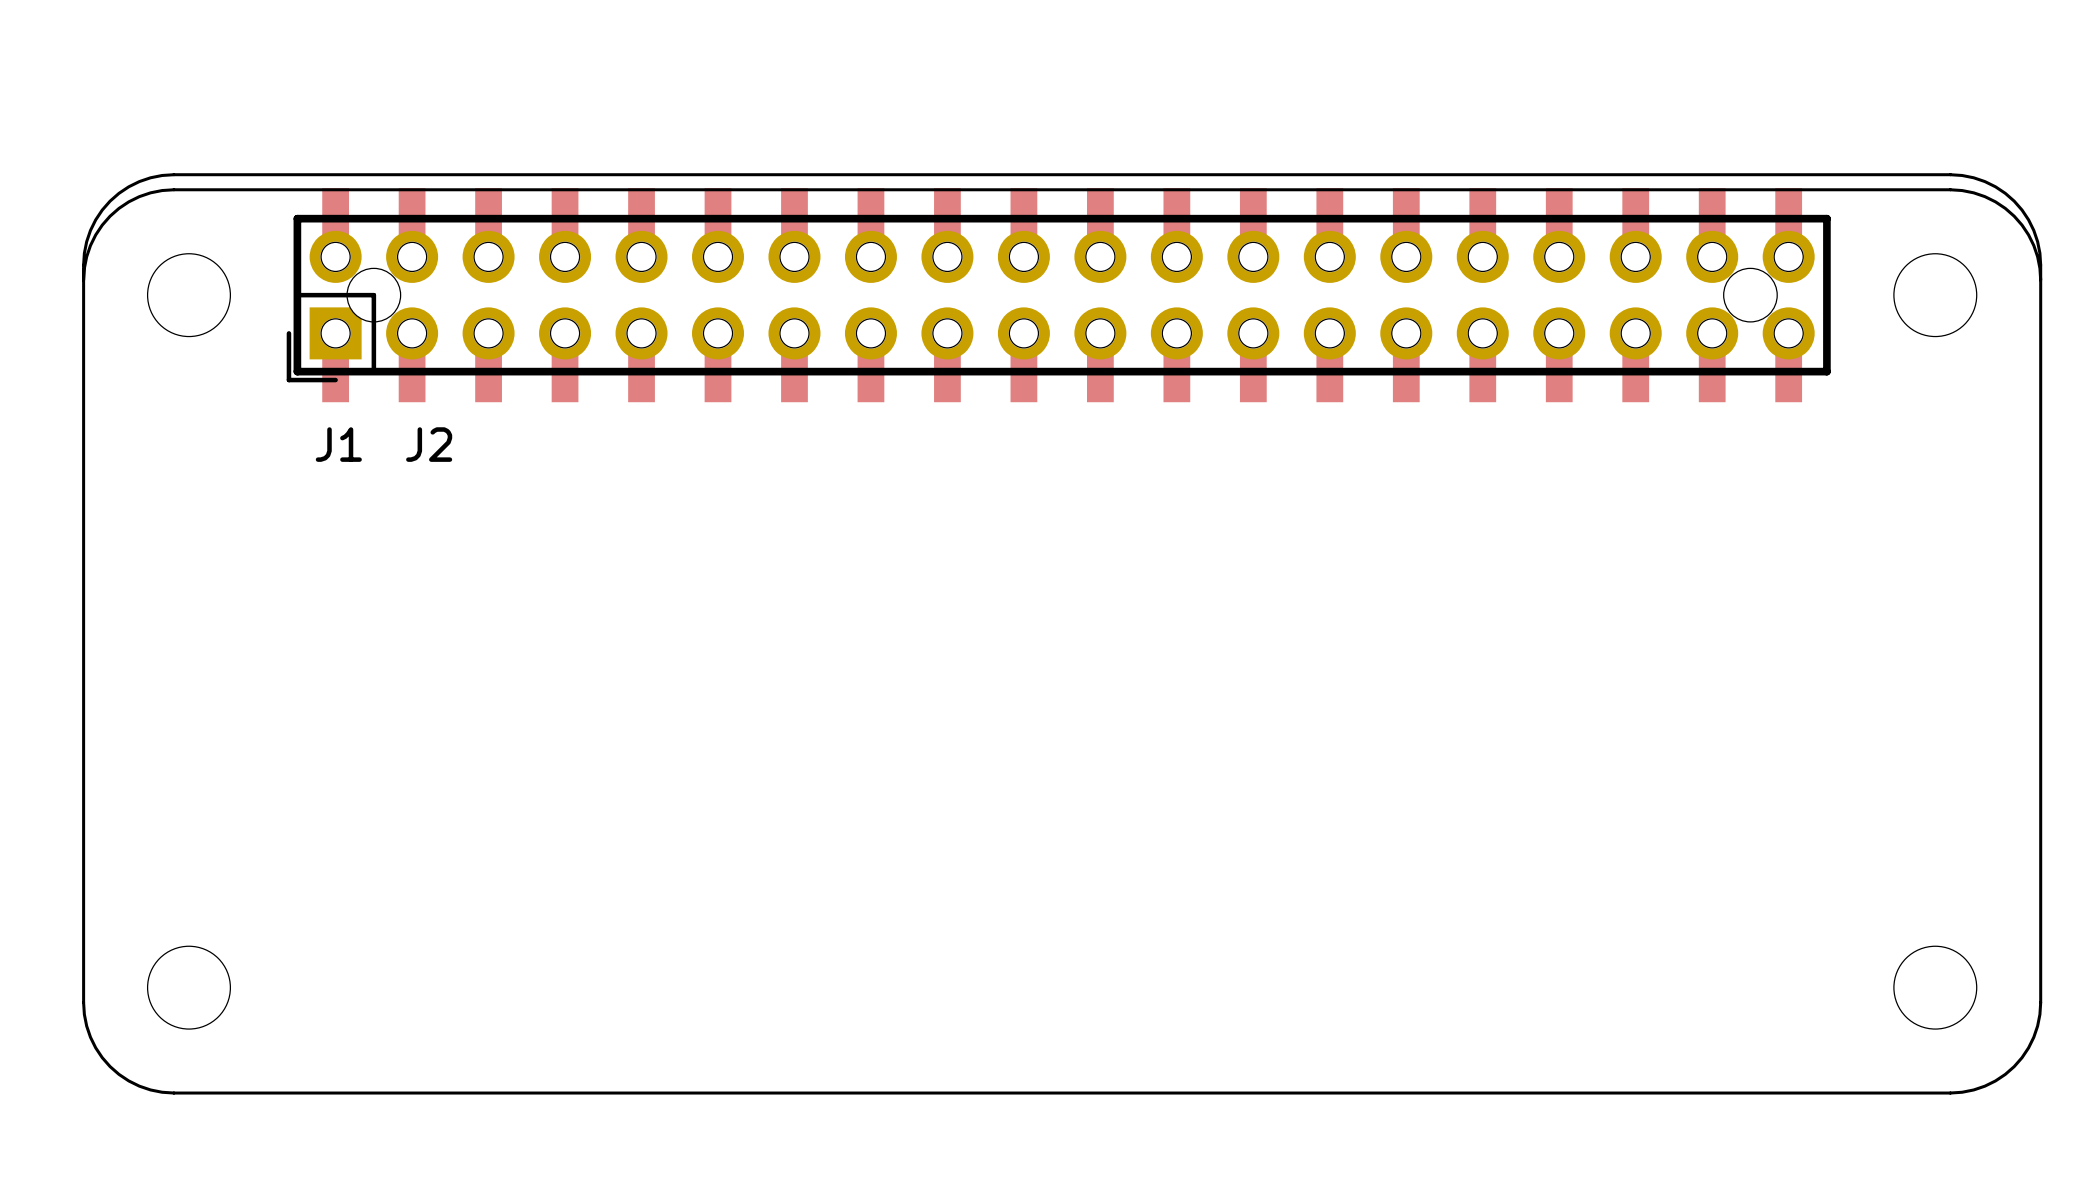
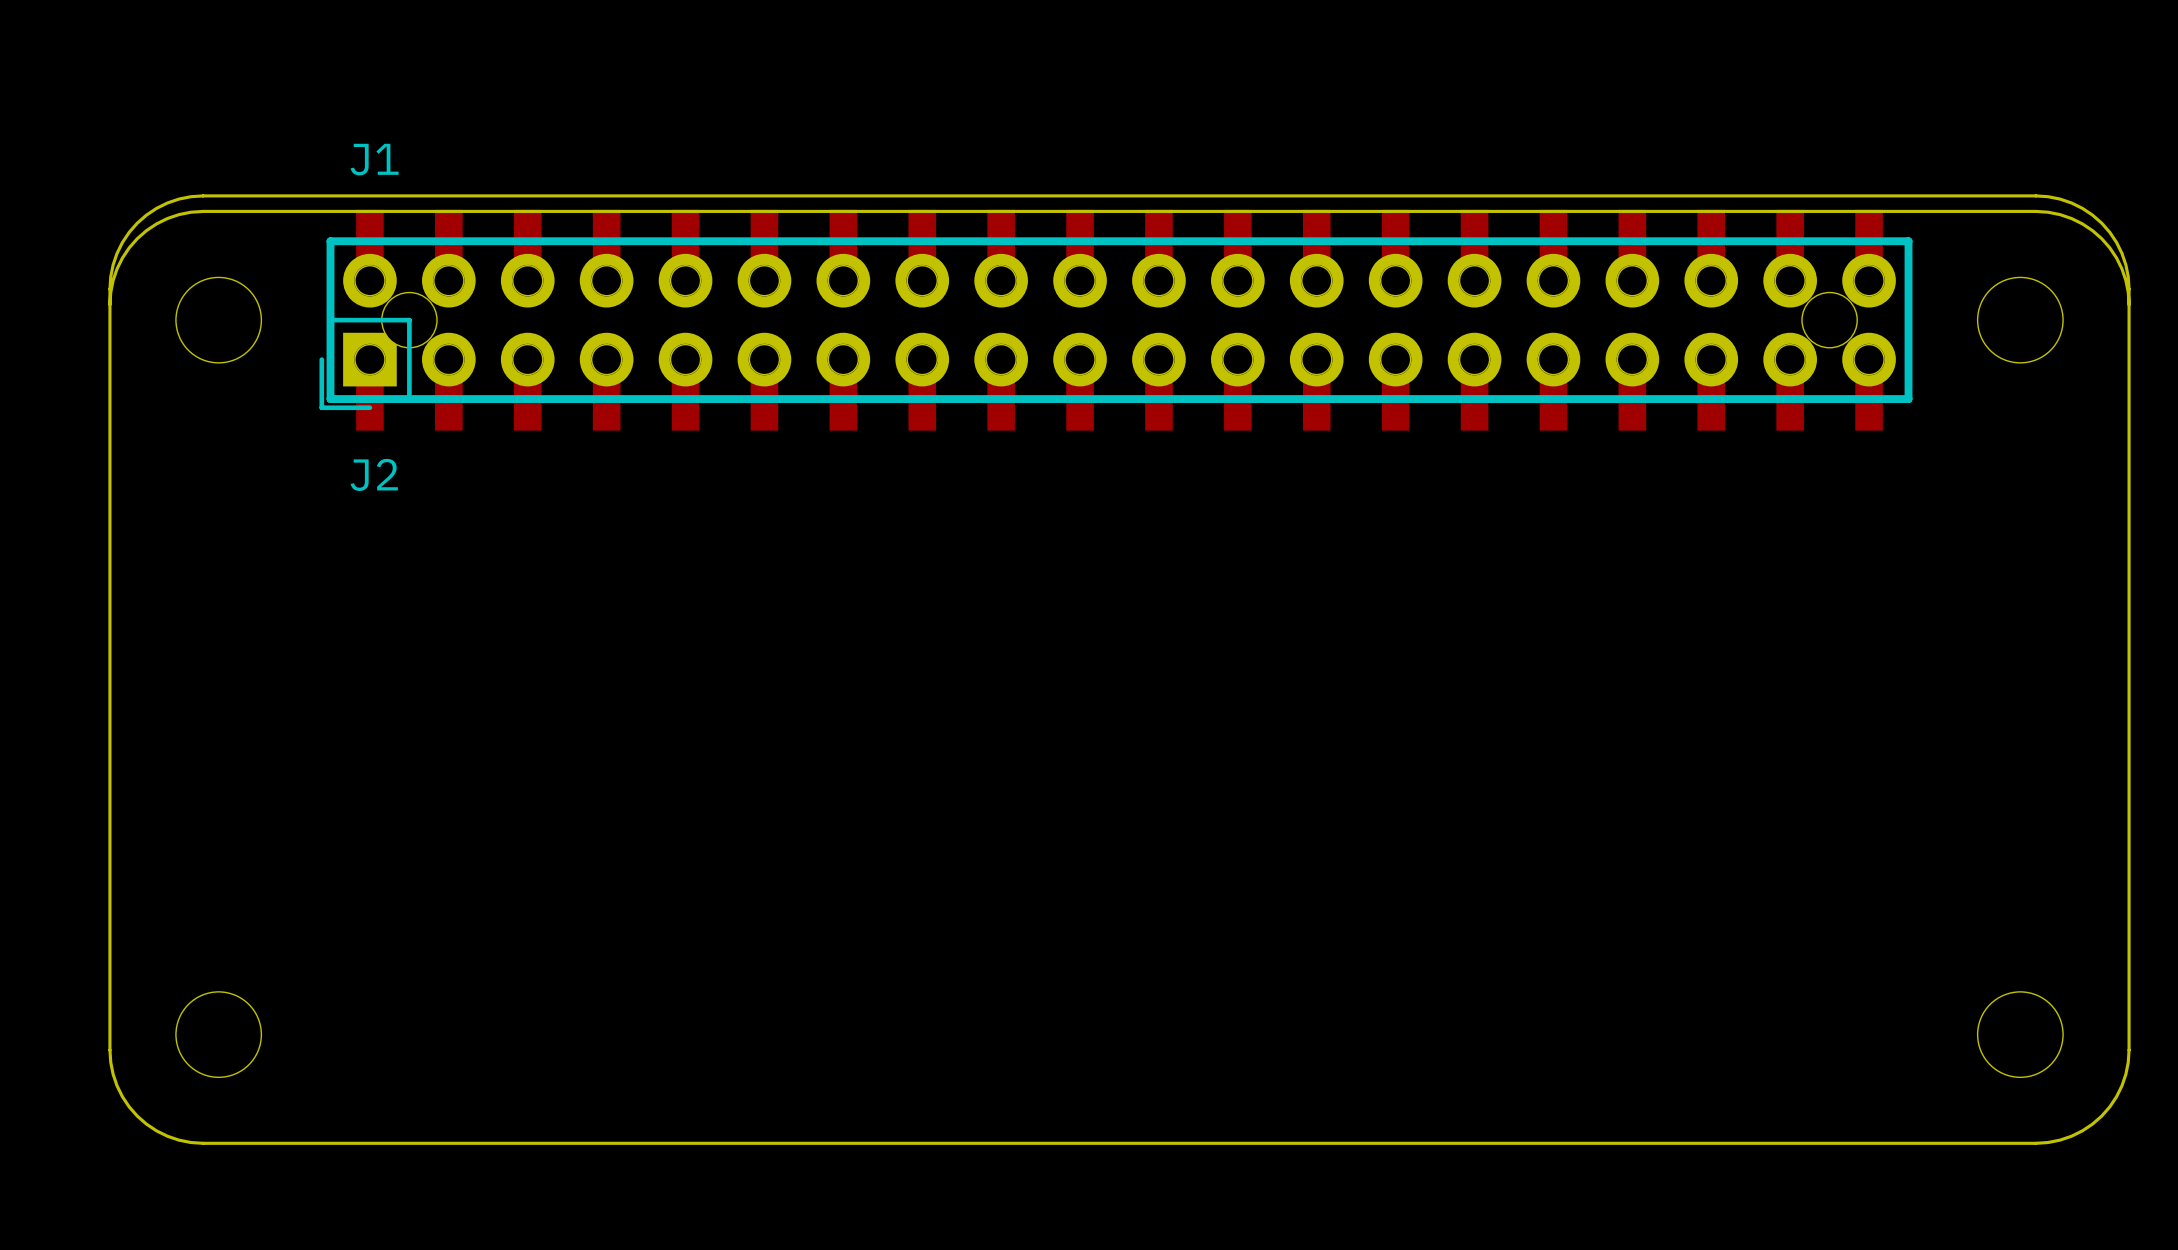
J1 name position: J1 (338, 444) -> J1 (374, 159)
J2 name position: J2 (429, 444) -> J2 (374, 474)

